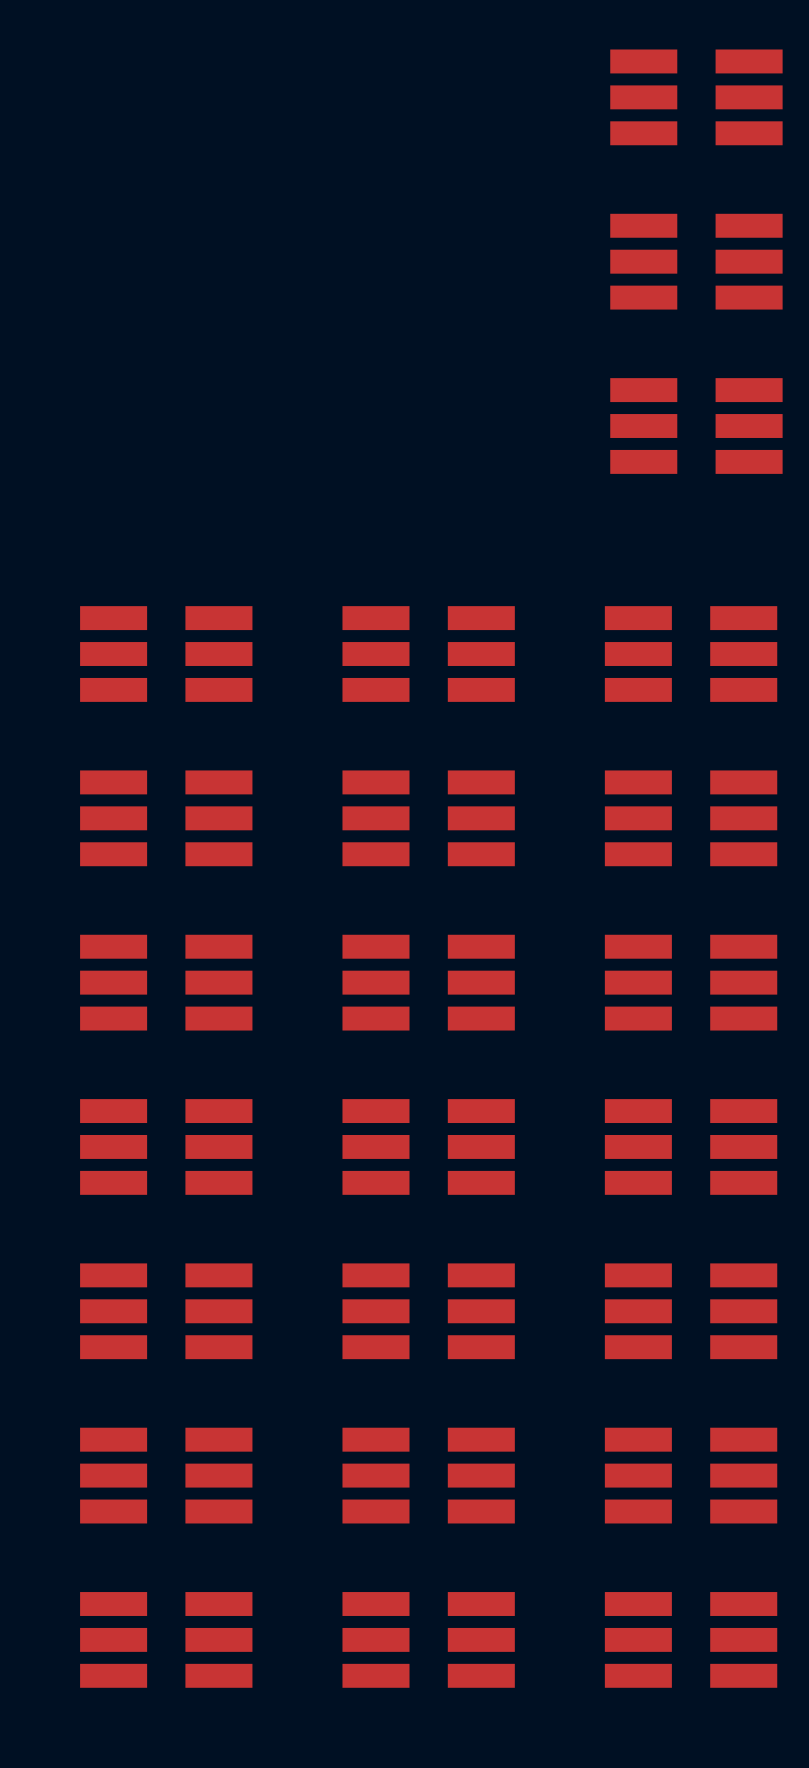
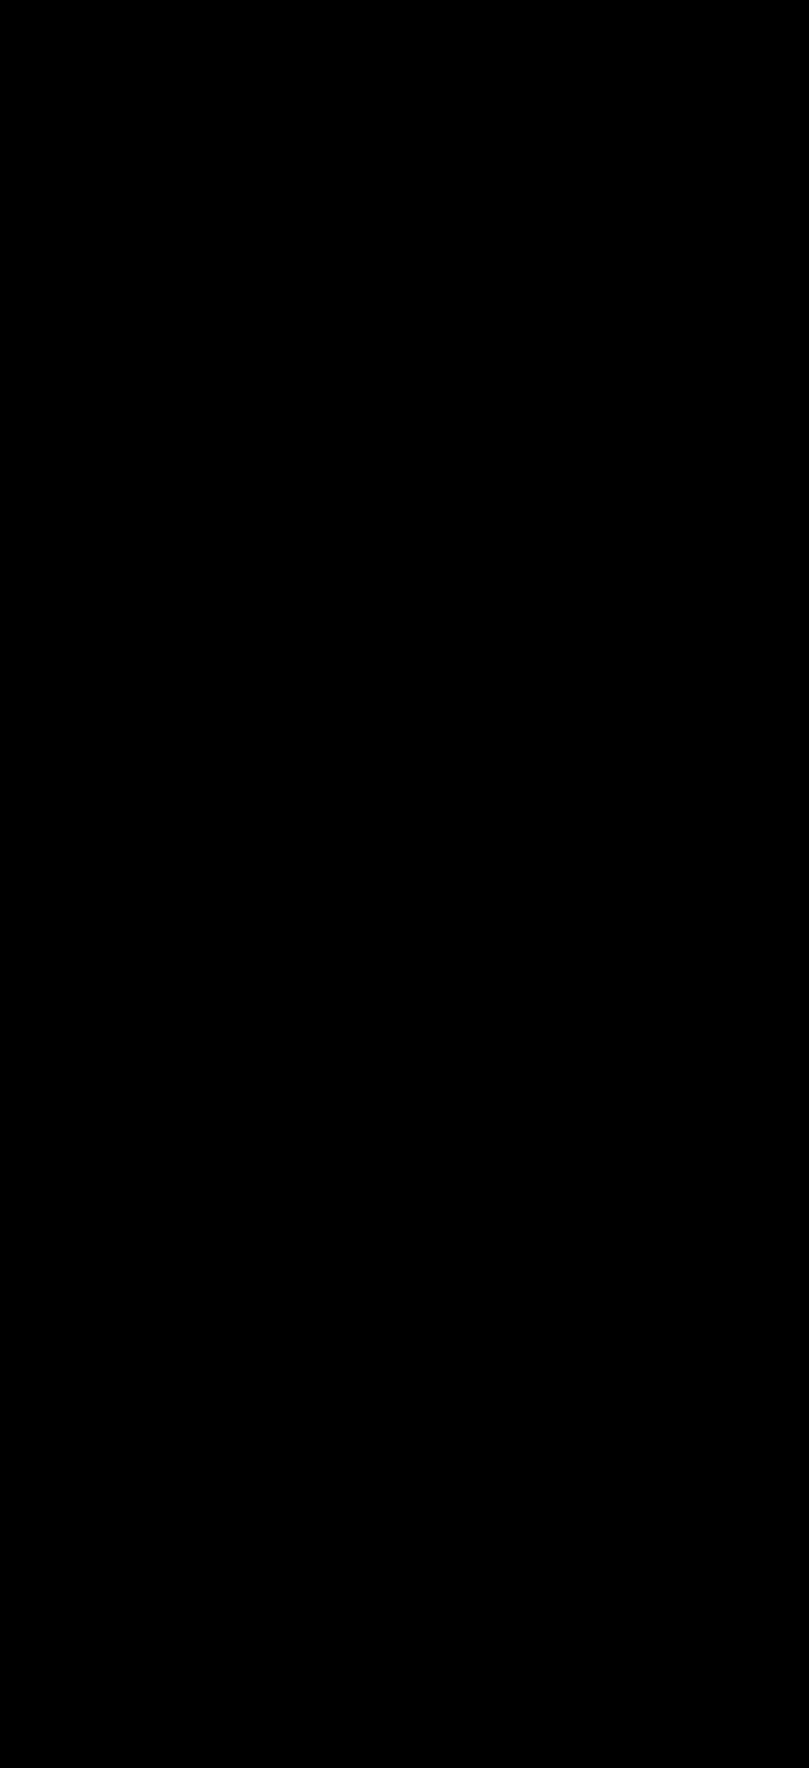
part: (696, 97) -> none
part: (696, 261) -> none
part: (696, 426) -> none
part: (166, 654) -> none
part: (428, 654) -> none
part: (691, 654) -> none
part: (166, 818) -> none
part: (428, 818) -> none
part: (691, 818) -> none
part: (166, 982) -> none
part: (428, 982) -> none
part: (691, 982) -> none
part: (166, 1146) -> none
part: (428, 1146) -> none
part: (691, 1146) -> none
part: (166, 1311) -> none
part: (428, 1311) -> none
part: (691, 1311) -> none
part: (166, 1475) -> none
part: (428, 1475) -> none
part: (691, 1475) -> none
part: (166, 1639) -> none
part: (428, 1639) -> none
part: (691, 1639) -> none

